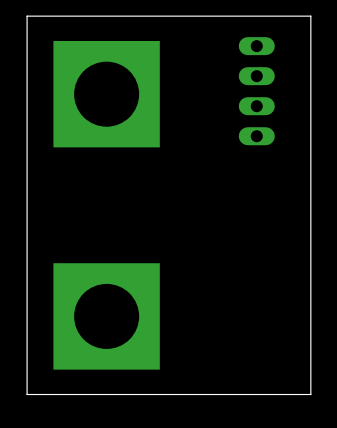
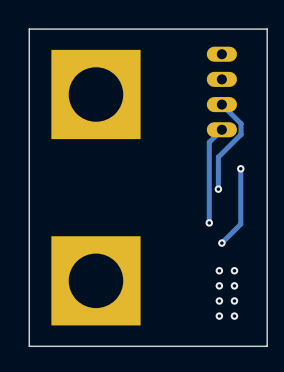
track: none -> (221, 104) (241, 123) (241, 134) (218, 157) (218, 189)
track: none -> (221, 129) (209, 142) (209, 222)
track: none -> (240, 168) (240, 224) (221, 243)
via: none -> (240, 168)
via: none -> (218, 189)
via: none -> (209, 222)
via: none -> (221, 243)
via: none -> (219, 270)
via: none -> (234, 270)
via: none -> (219, 285)
via: none -> (234, 285)
via: none -> (219, 300)
via: none -> (234, 300)
via: none -> (219, 316)
via: none -> (234, 316)

